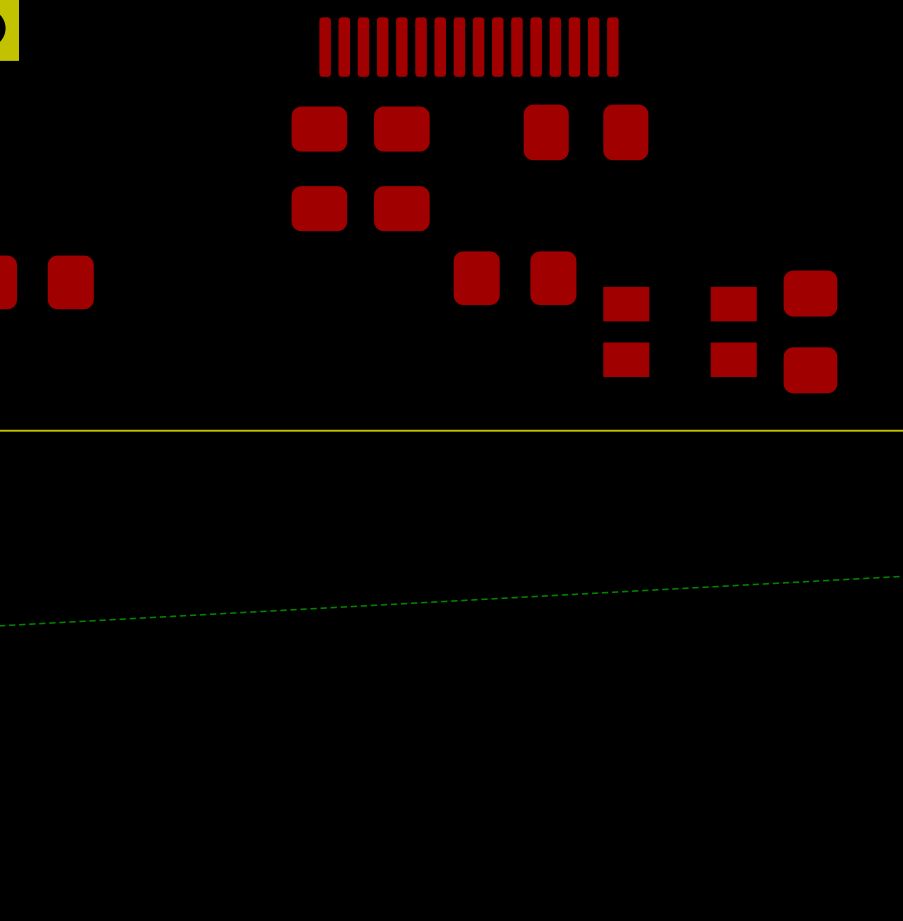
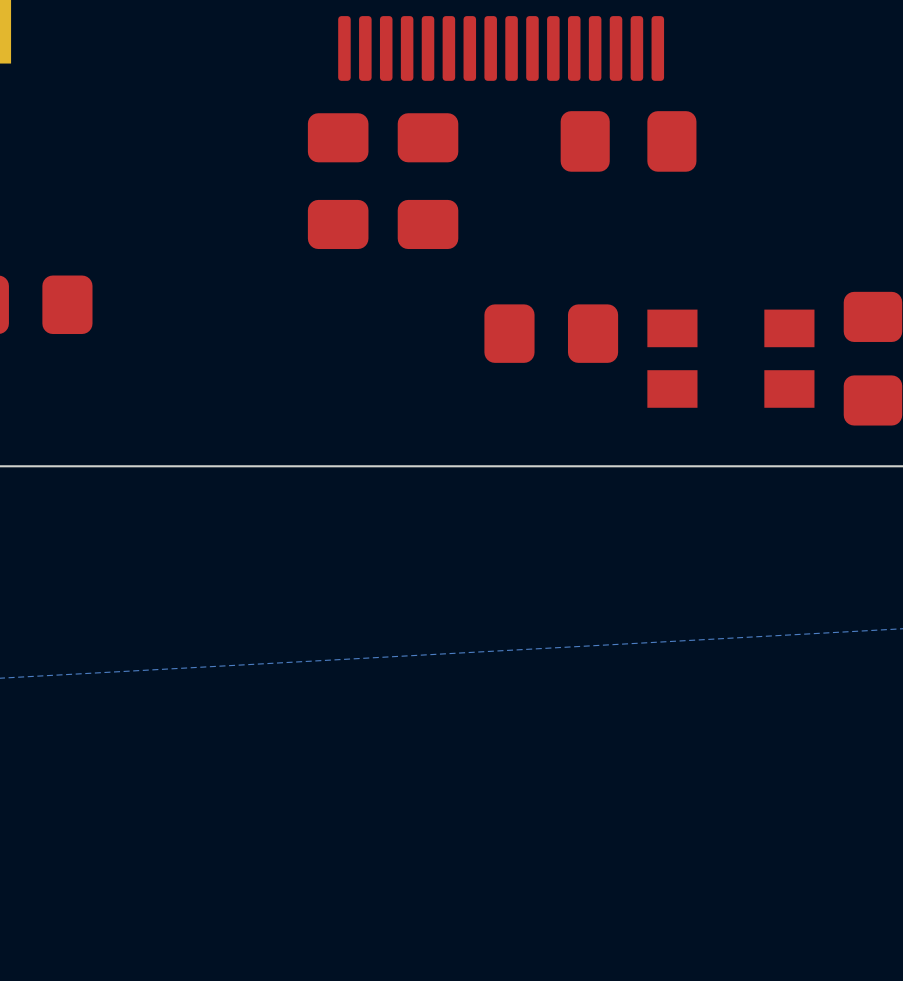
part position: (515, 278) -> (551, 333)

